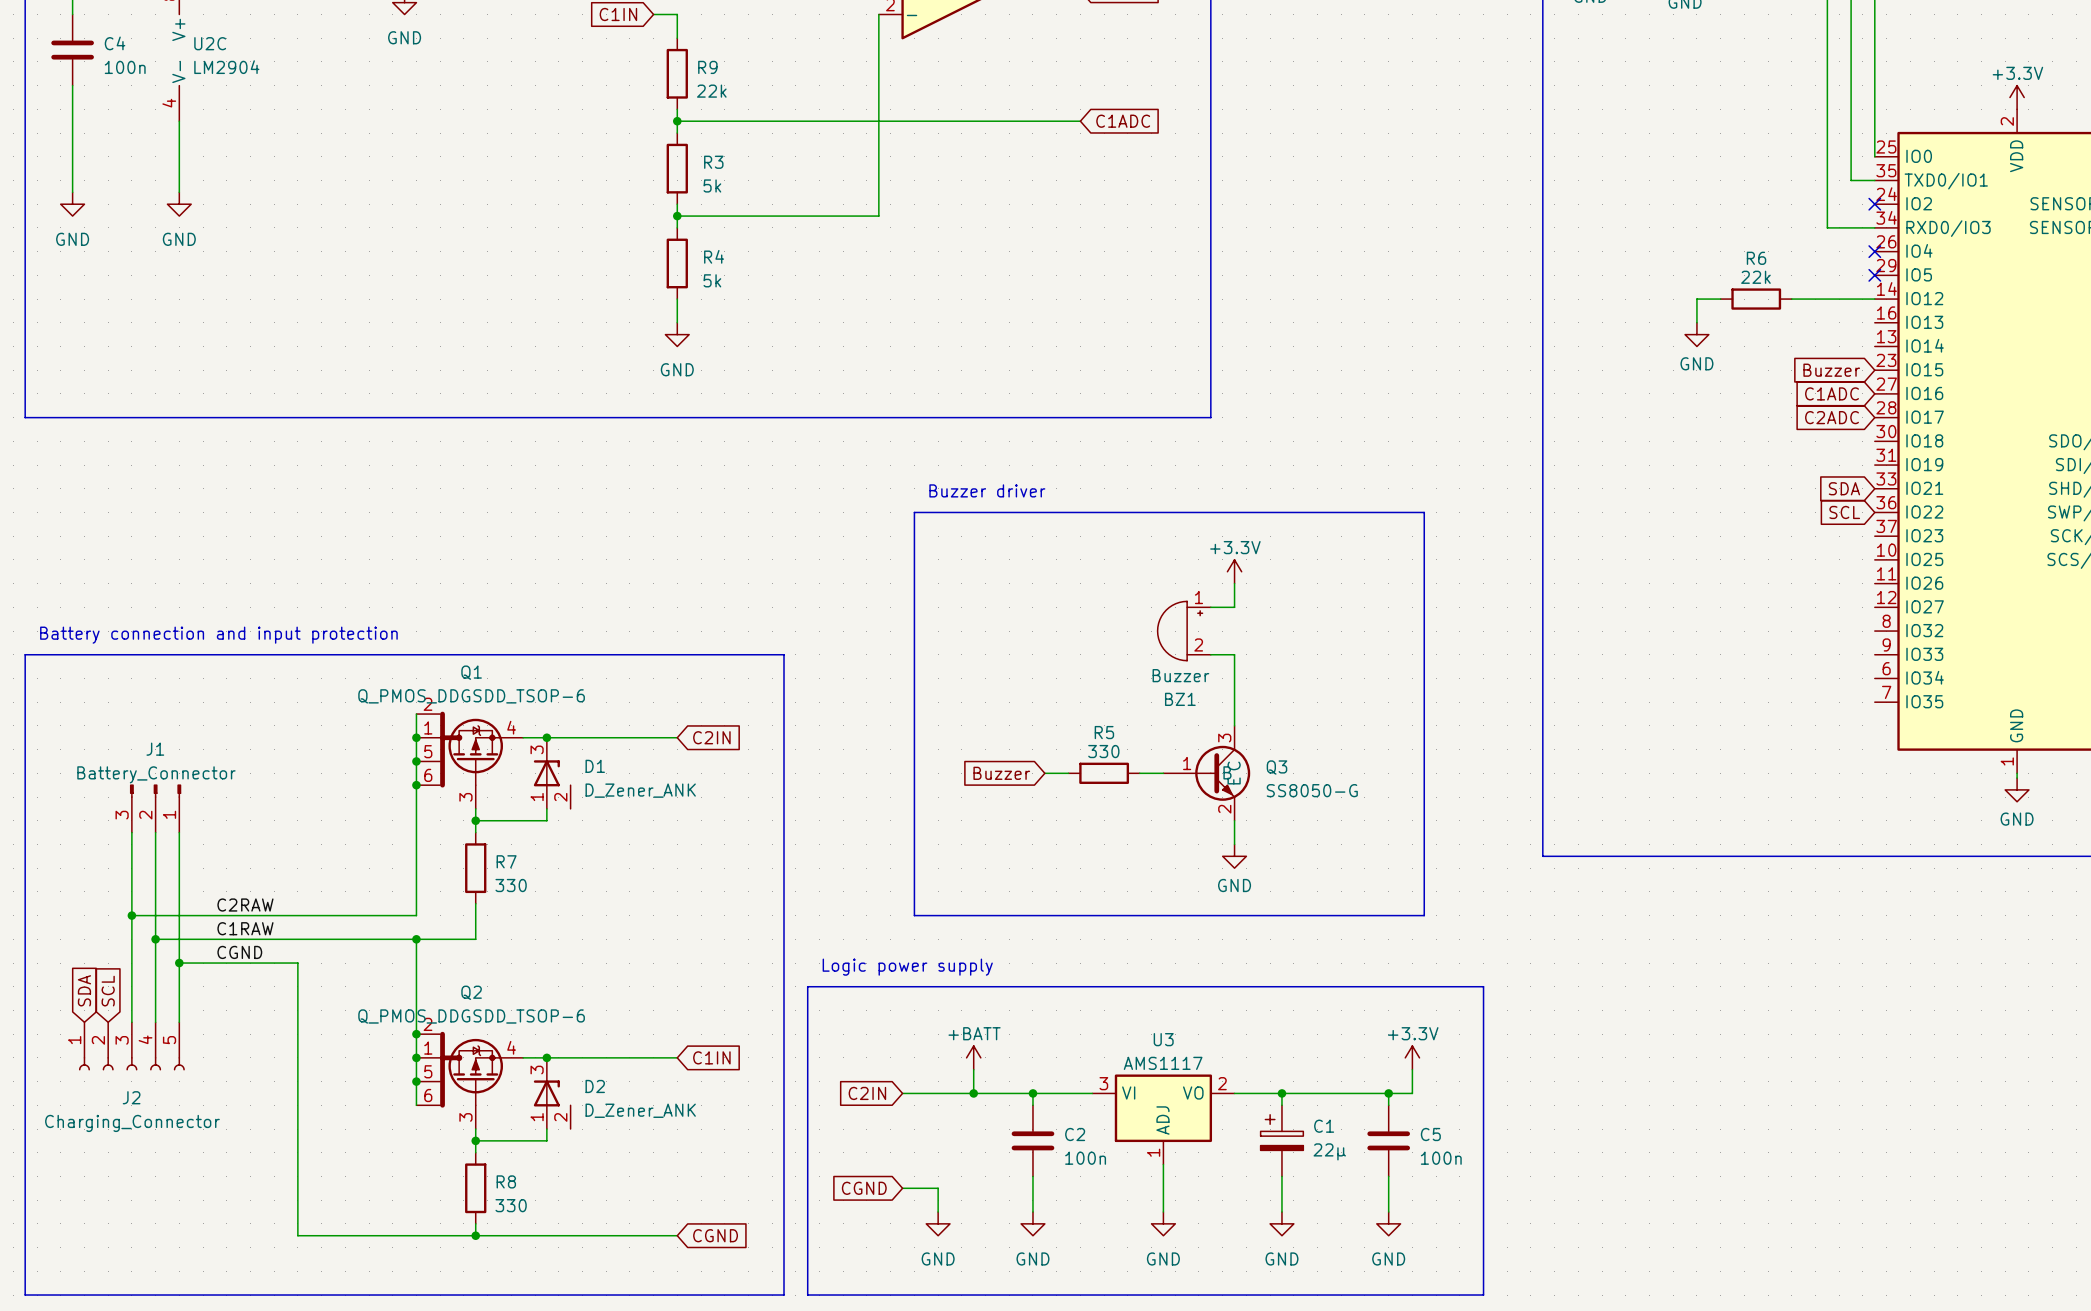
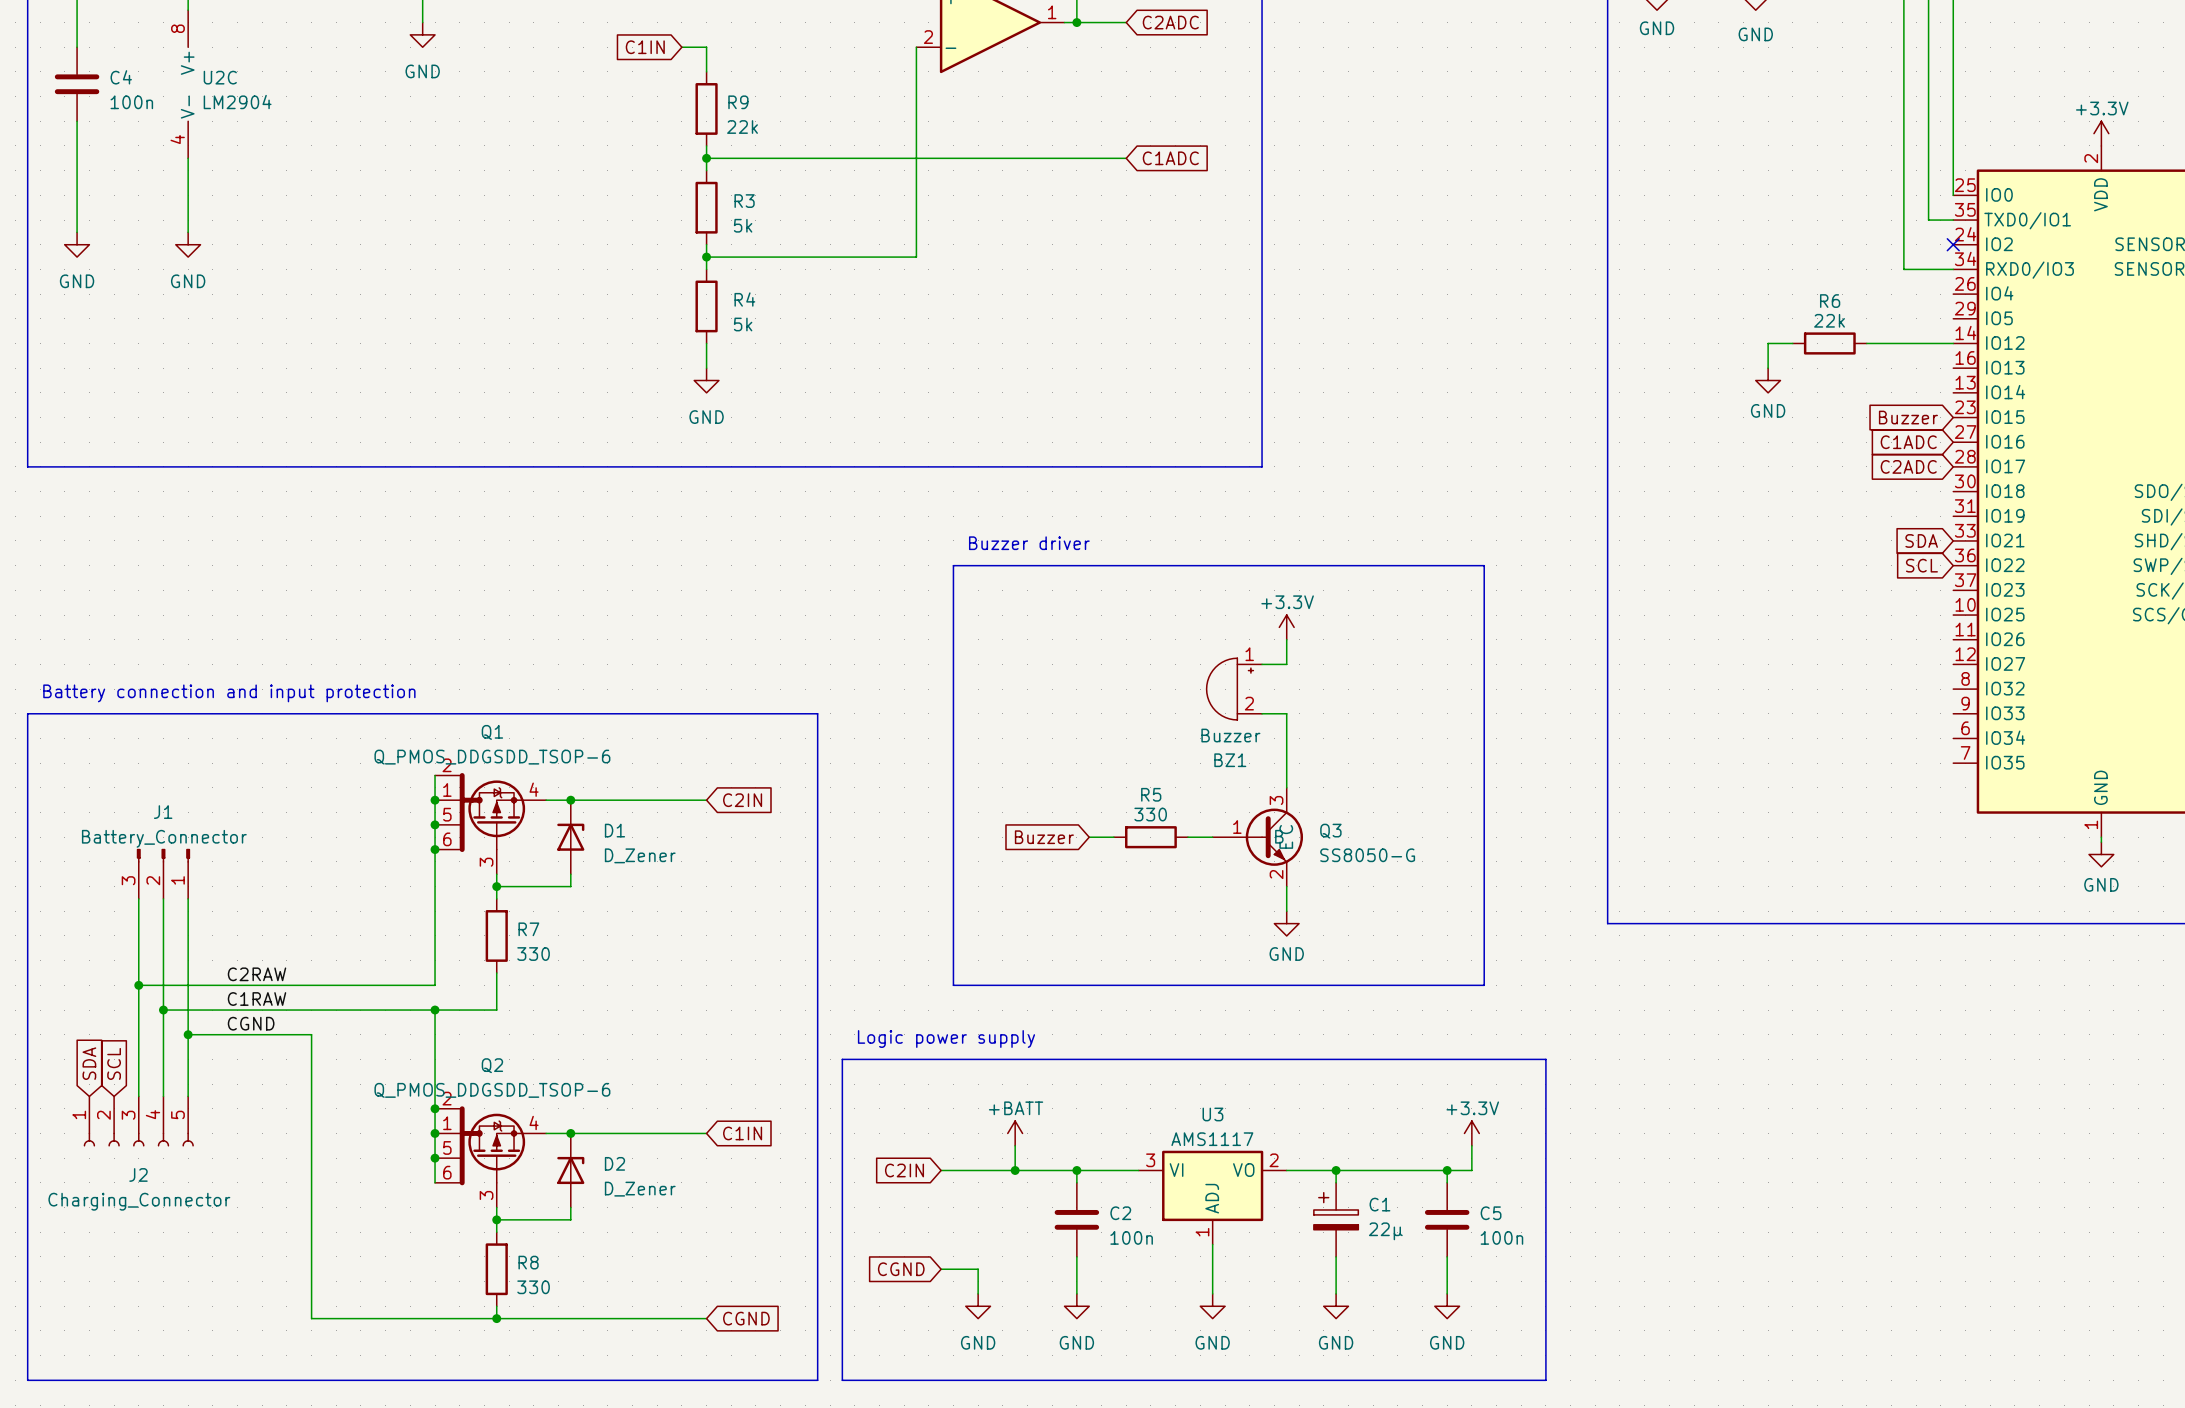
no-connect mark: (1874, 251) -> none
no-connect mark: (1874, 275) -> none
D1 symbol: [533, 737, 571, 809] -> [557, 800, 585, 875]
D1 value: D_Zener_ANK (640, 790) -> D_Zener (640, 855)
D2 symbol: [533, 1057, 571, 1130] -> [557, 1133, 585, 1208]
D2 value: D_Zener_ANK (640, 1110) -> D_Zener (640, 1189)

